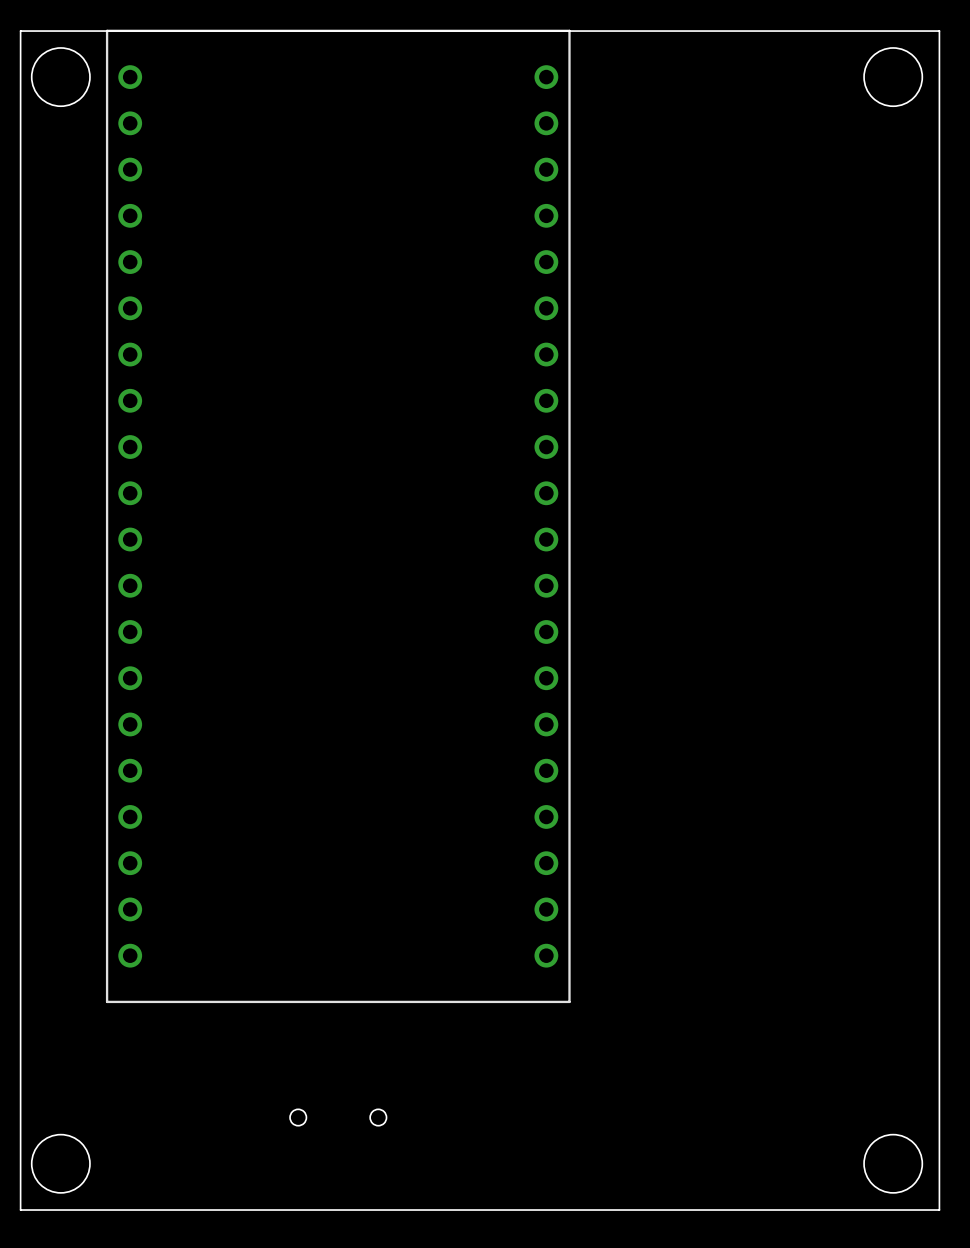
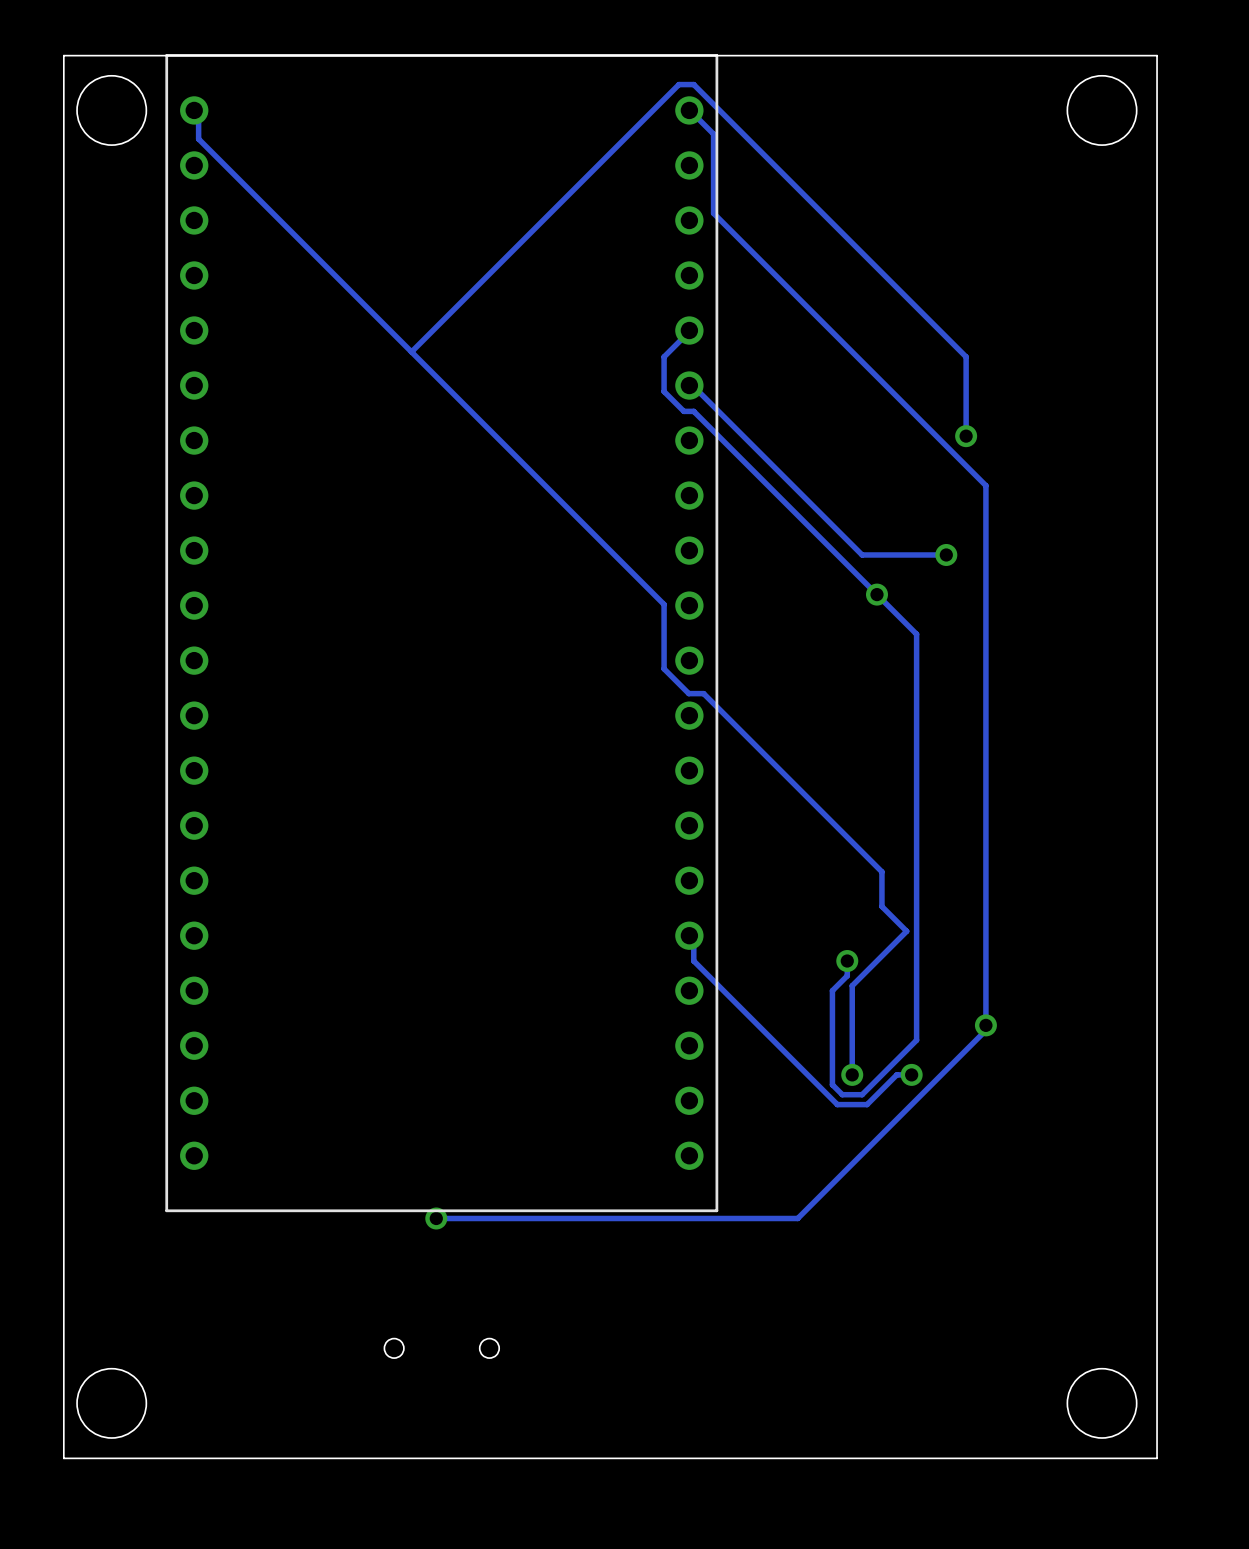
track: none -> (194, 110) (198, 114) (198, 139) (664, 604) (664, 668) (688, 693) (703, 693) (881, 871) (881, 906) (906, 931) (852, 985) (852, 1074)
track: none -> (689, 110) (713, 134) (713, 213) (985, 485) (985, 1030) (797, 1218) (436, 1218)
track: none -> (689, 330) (664, 356) (664, 391) (683, 411) (693, 411) (916, 634) (916, 1040) (862, 1094) (842, 1094) (832, 1084) (832, 990) (847, 975) (847, 961)
track: none -> (411, 351) (678, 84) (693, 84) (966, 356) (966, 436)
track: none -> (689, 385) (693, 386) (862, 554) (946, 554)
via: none -> (966, 436)
via: none -> (946, 554)
via: none -> (876, 594)
track: none -> (689, 935) (693, 936) (693, 961) (837, 1104) (867, 1104) (896, 1074) (911, 1074)
via: none -> (847, 961)
via: none -> (985, 1025)
via: none -> (852, 1074)
via: none -> (911, 1074)
via: none -> (436, 1218)

